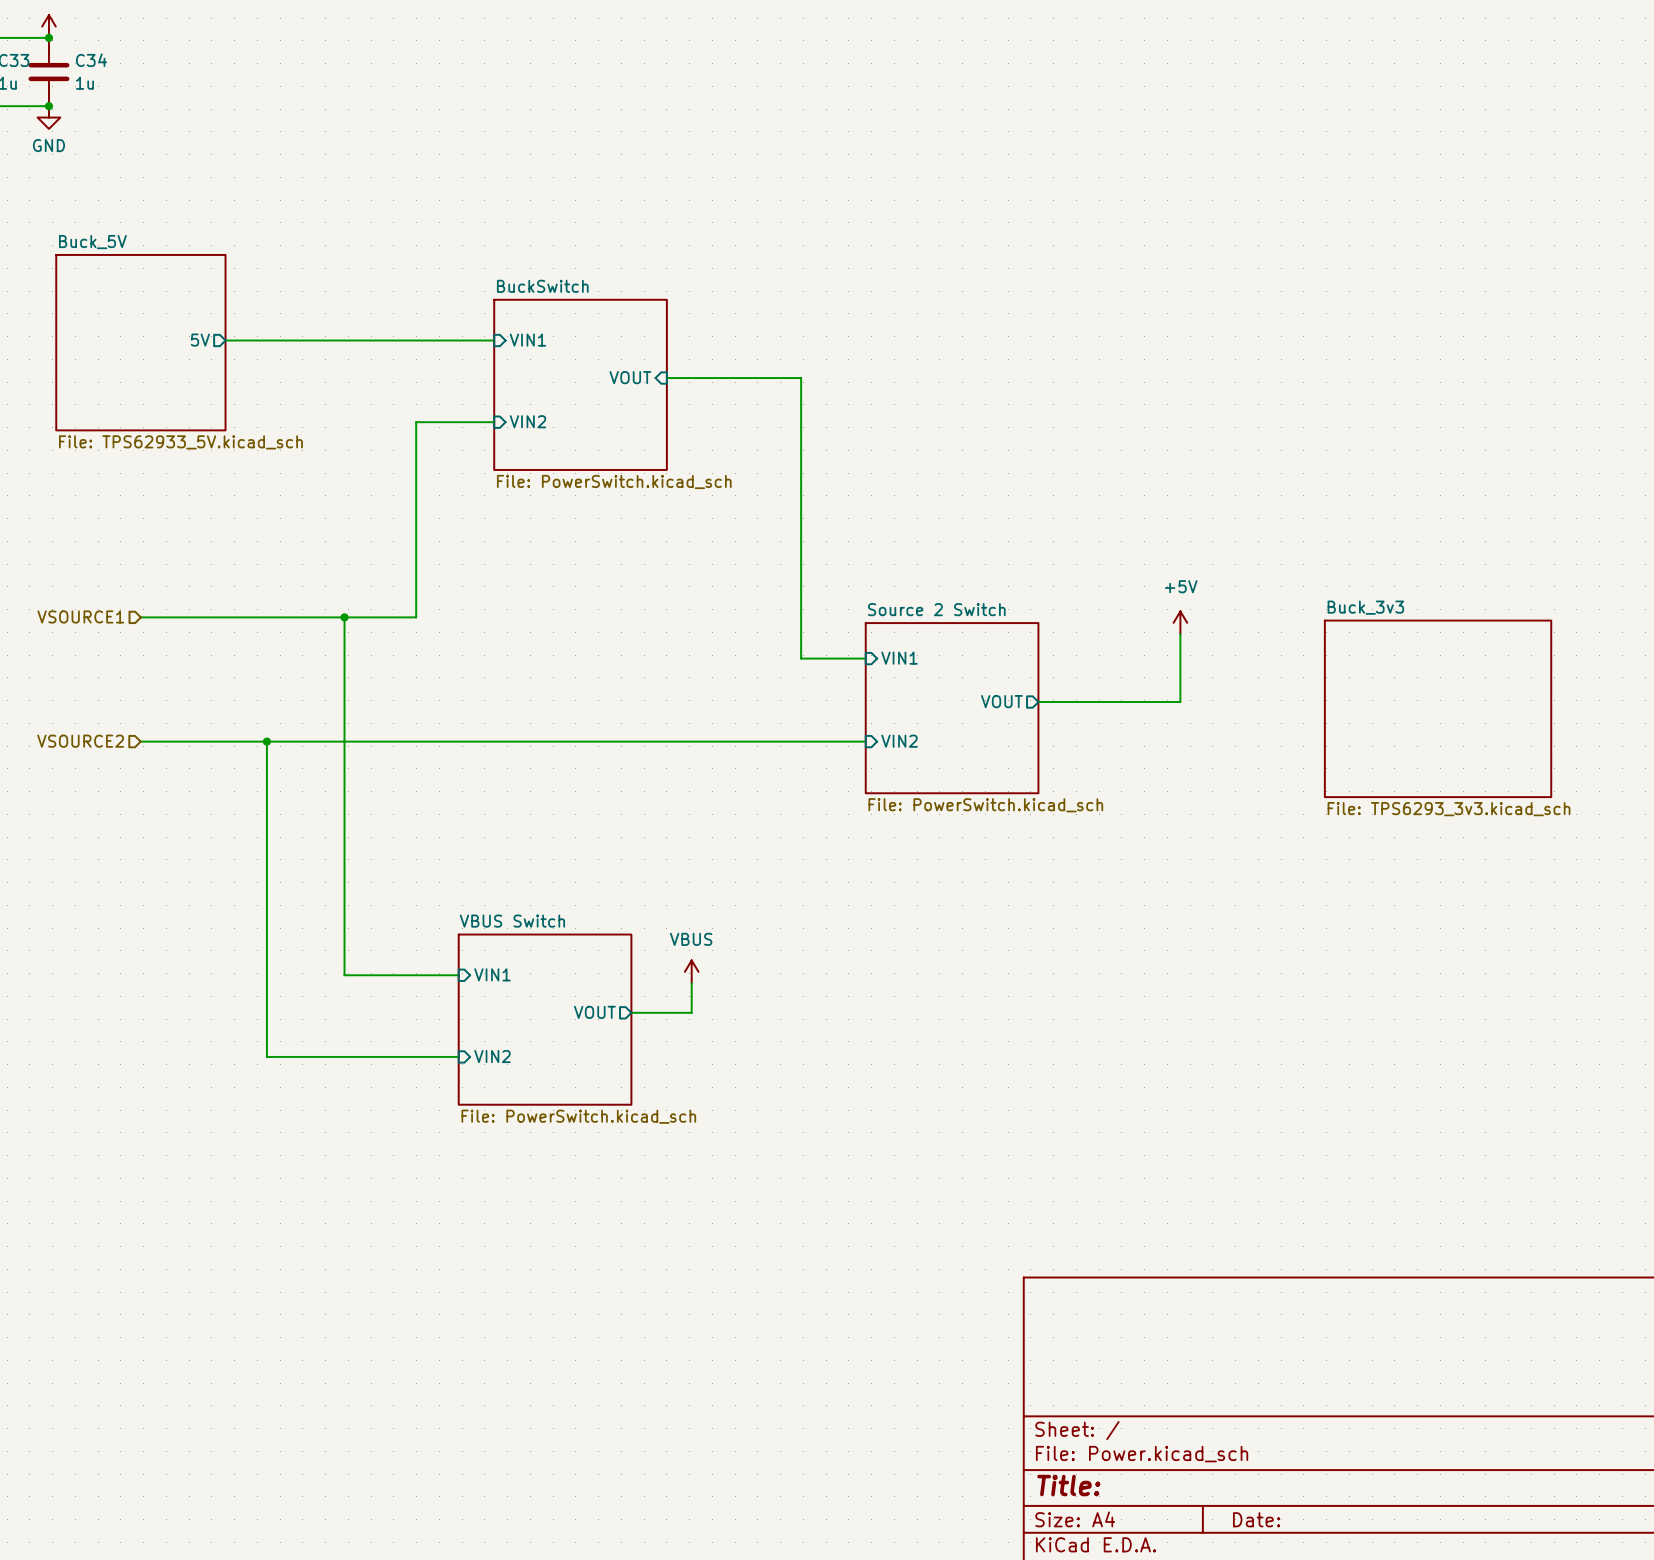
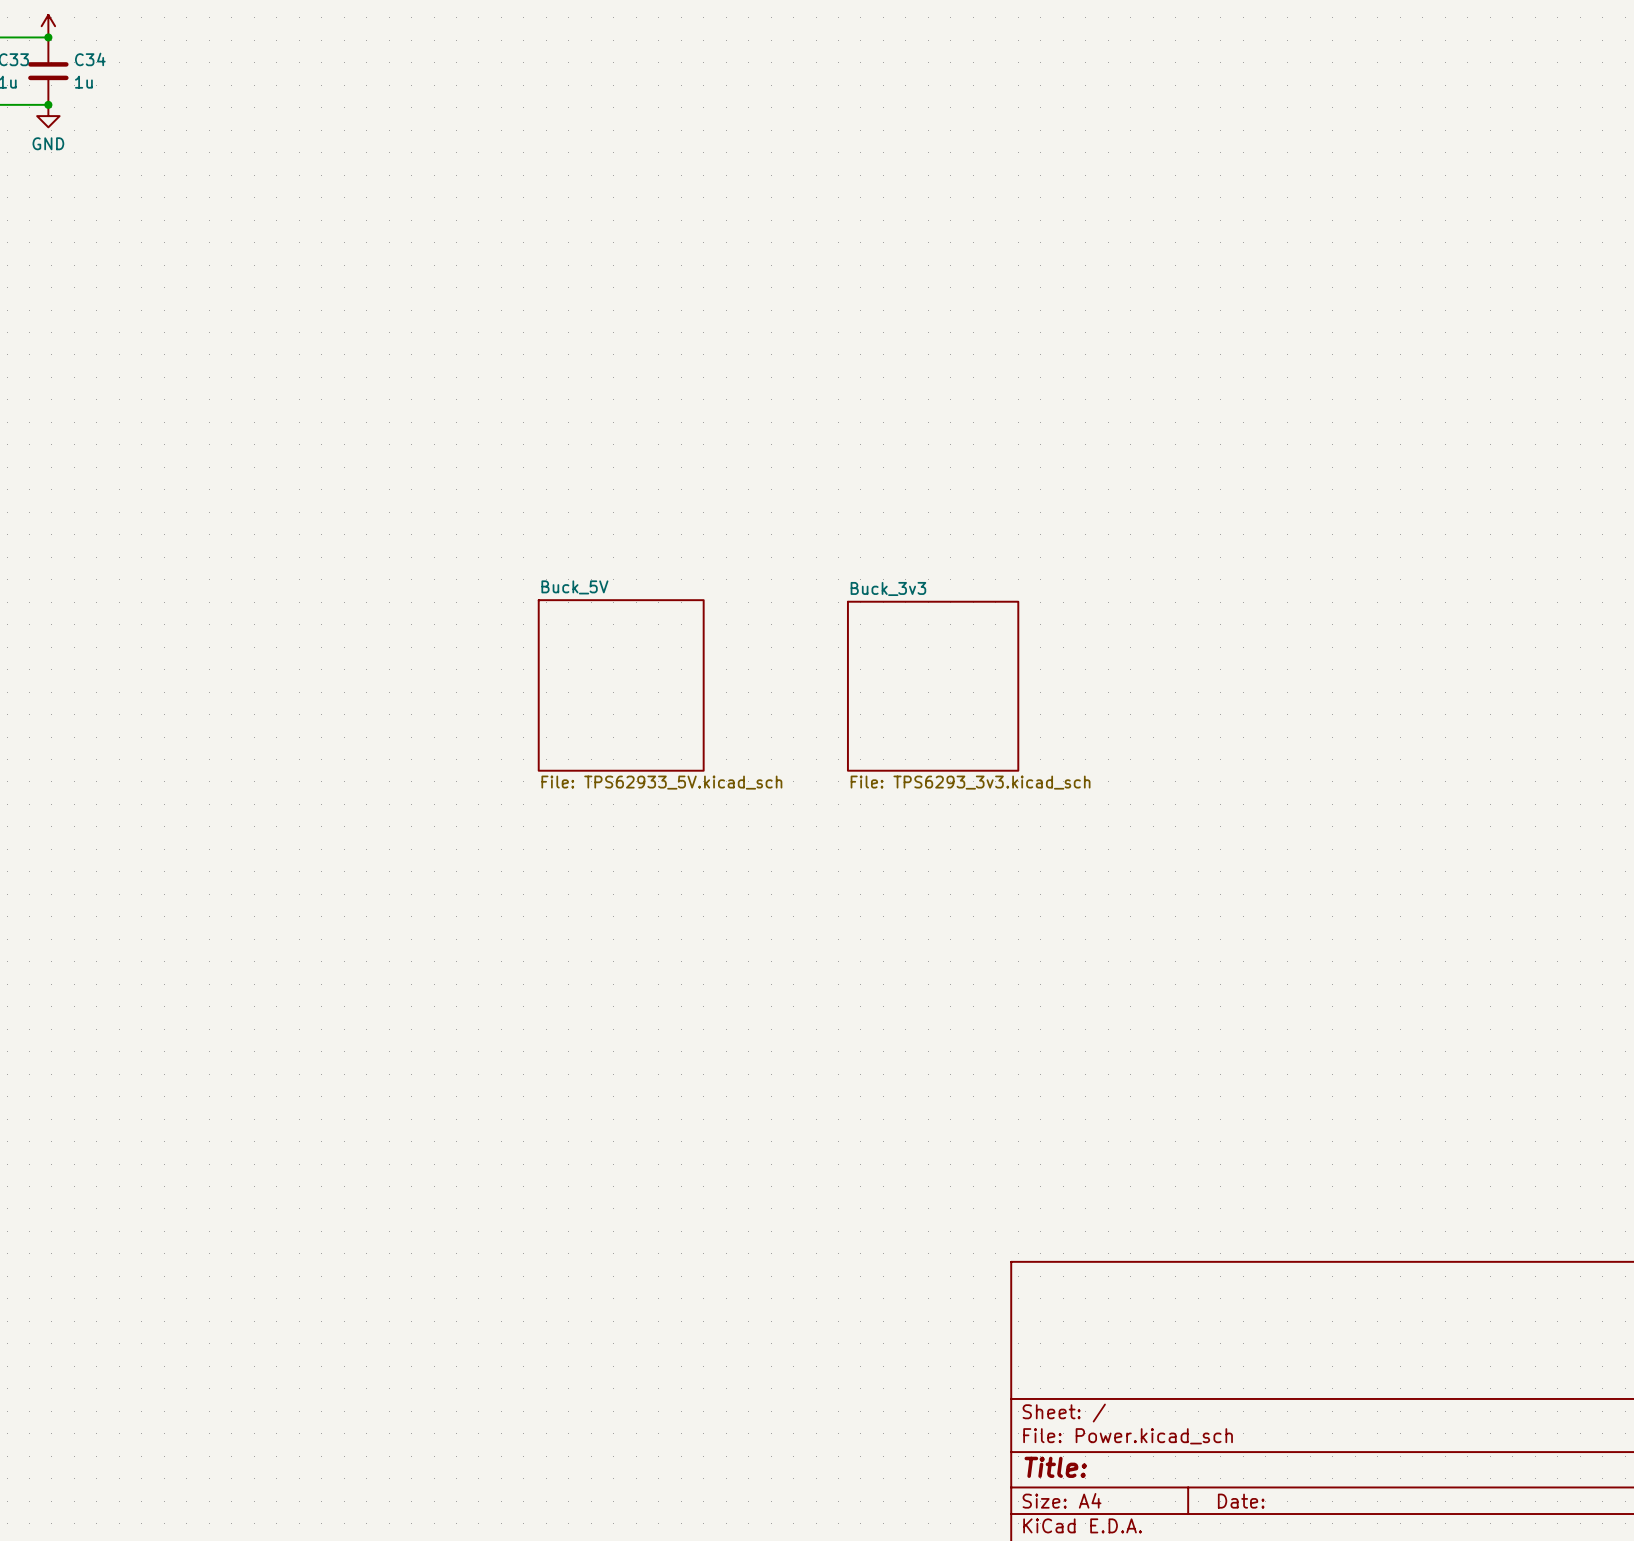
sheet Buck_5V shape: [55, 254, 227, 432] -> [538, 599, 705, 772]
sheet pin: 5V (200, 340) -> none
wire: (225, 340) (494, 340) -> none
sheet pin: VIN1 (527, 340) -> none
sheet pin: VOUT (630, 377) -> none
wire: (666, 378) (801, 378) (801, 658) (865, 658) -> none
sheet BuckSwitch: File: PowerSwitch.kicad_sch (580, 384) -> none
sheet pin: VIN2 (527, 421) -> none
wire: (494, 422) (416, 422) (416, 617) (140, 617) -> none
sheet Buck_3v3 name position: Buck_3v3 (1365, 607) -> Buck_3v3 (888, 588)
hierarchical label: VSOURCE1 (80, 616) -> none
wire: (344, 617) (344, 975) (458, 975) -> none
junction: (344, 617) -> none
sheet Buck_3v3 shape: [1324, 619, 1552, 798] -> [847, 601, 1019, 772]
power symbol: +5V (1180, 622) -> none
wire: (1180, 634) (1180, 702) (1038, 702) -> none
sheet pin: VIN1 (899, 658) -> none
sheet pin: VOUT (1001, 701) -> none
sheet Source 2 Switch: File: PowerSwitch.kicad_sch (952, 708) -> none
hierarchical label: VSOURCE2 (80, 741) -> none
wire: (140, 741) (865, 741) -> none
wire: (266, 741) (266, 1056) (458, 1056) -> none
junction: (266, 741) -> none
sheet pin: VIN2 (899, 741) -> none
sheet Buck_3v3 value position: File: TPS6293_3v3.kicad_sch (1449, 809) -> File: TPS6293_3v3.kicad_sch (970, 782)
power symbol: VBUS (691, 971) -> none
sheet pin: VIN1 (492, 974) -> none
wire: (691, 983) (691, 1012) (631, 1012) -> none
sheet pin: VOUT (594, 1012) -> none
sheet VBUS Switch: File: PowerSwitch.kicad_sch (545, 1019) -> none
sheet pin: VIN2 (492, 1056) -> none

